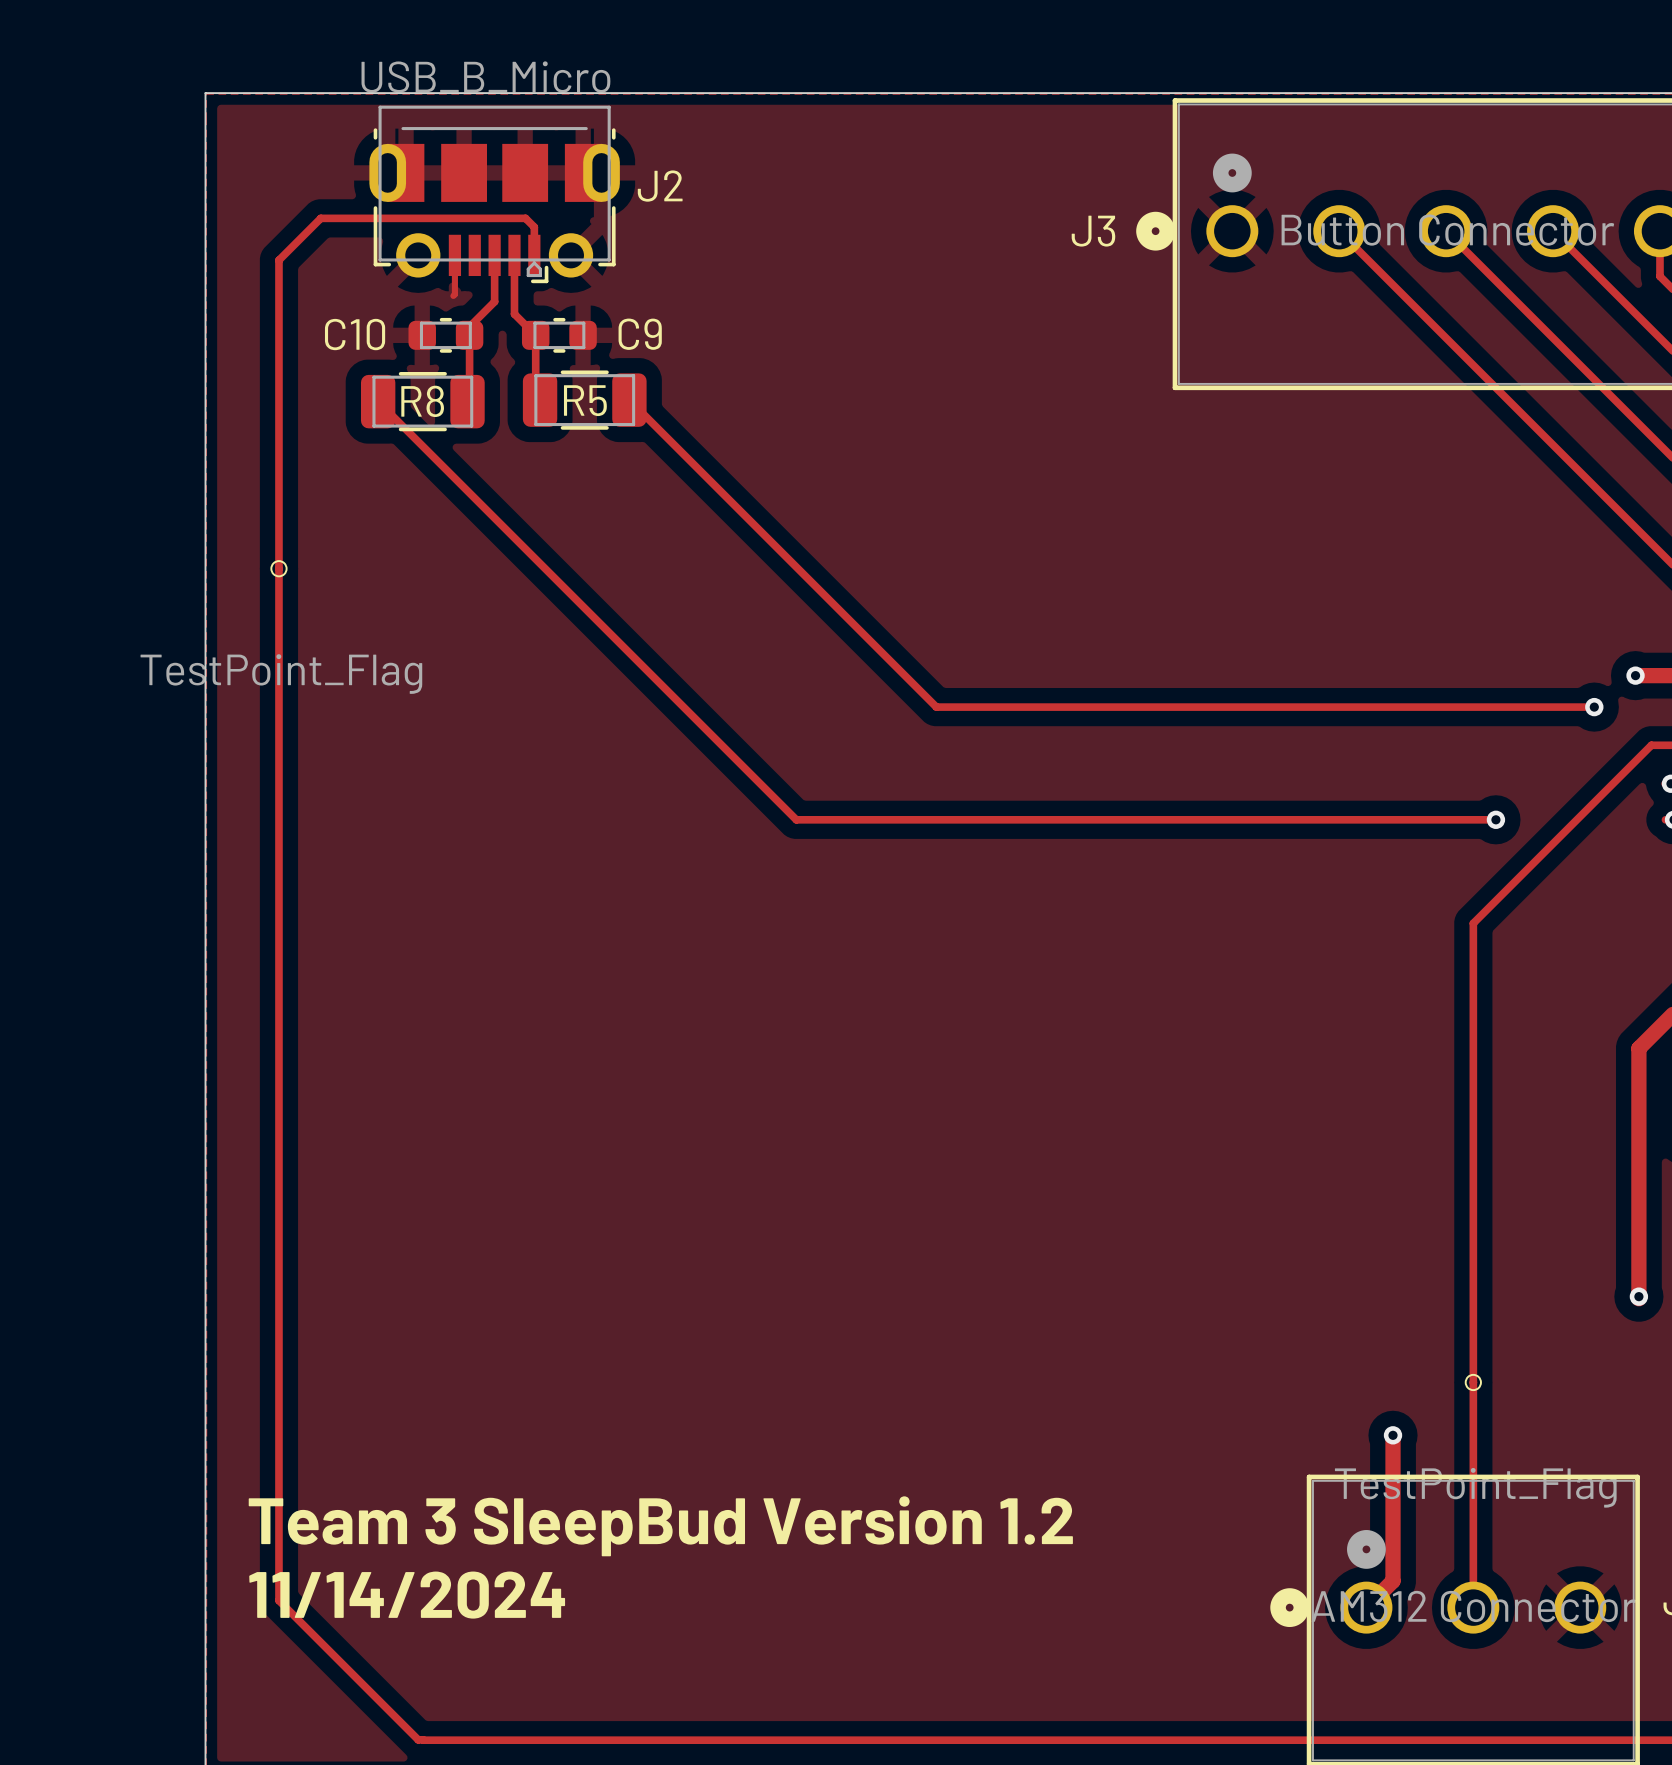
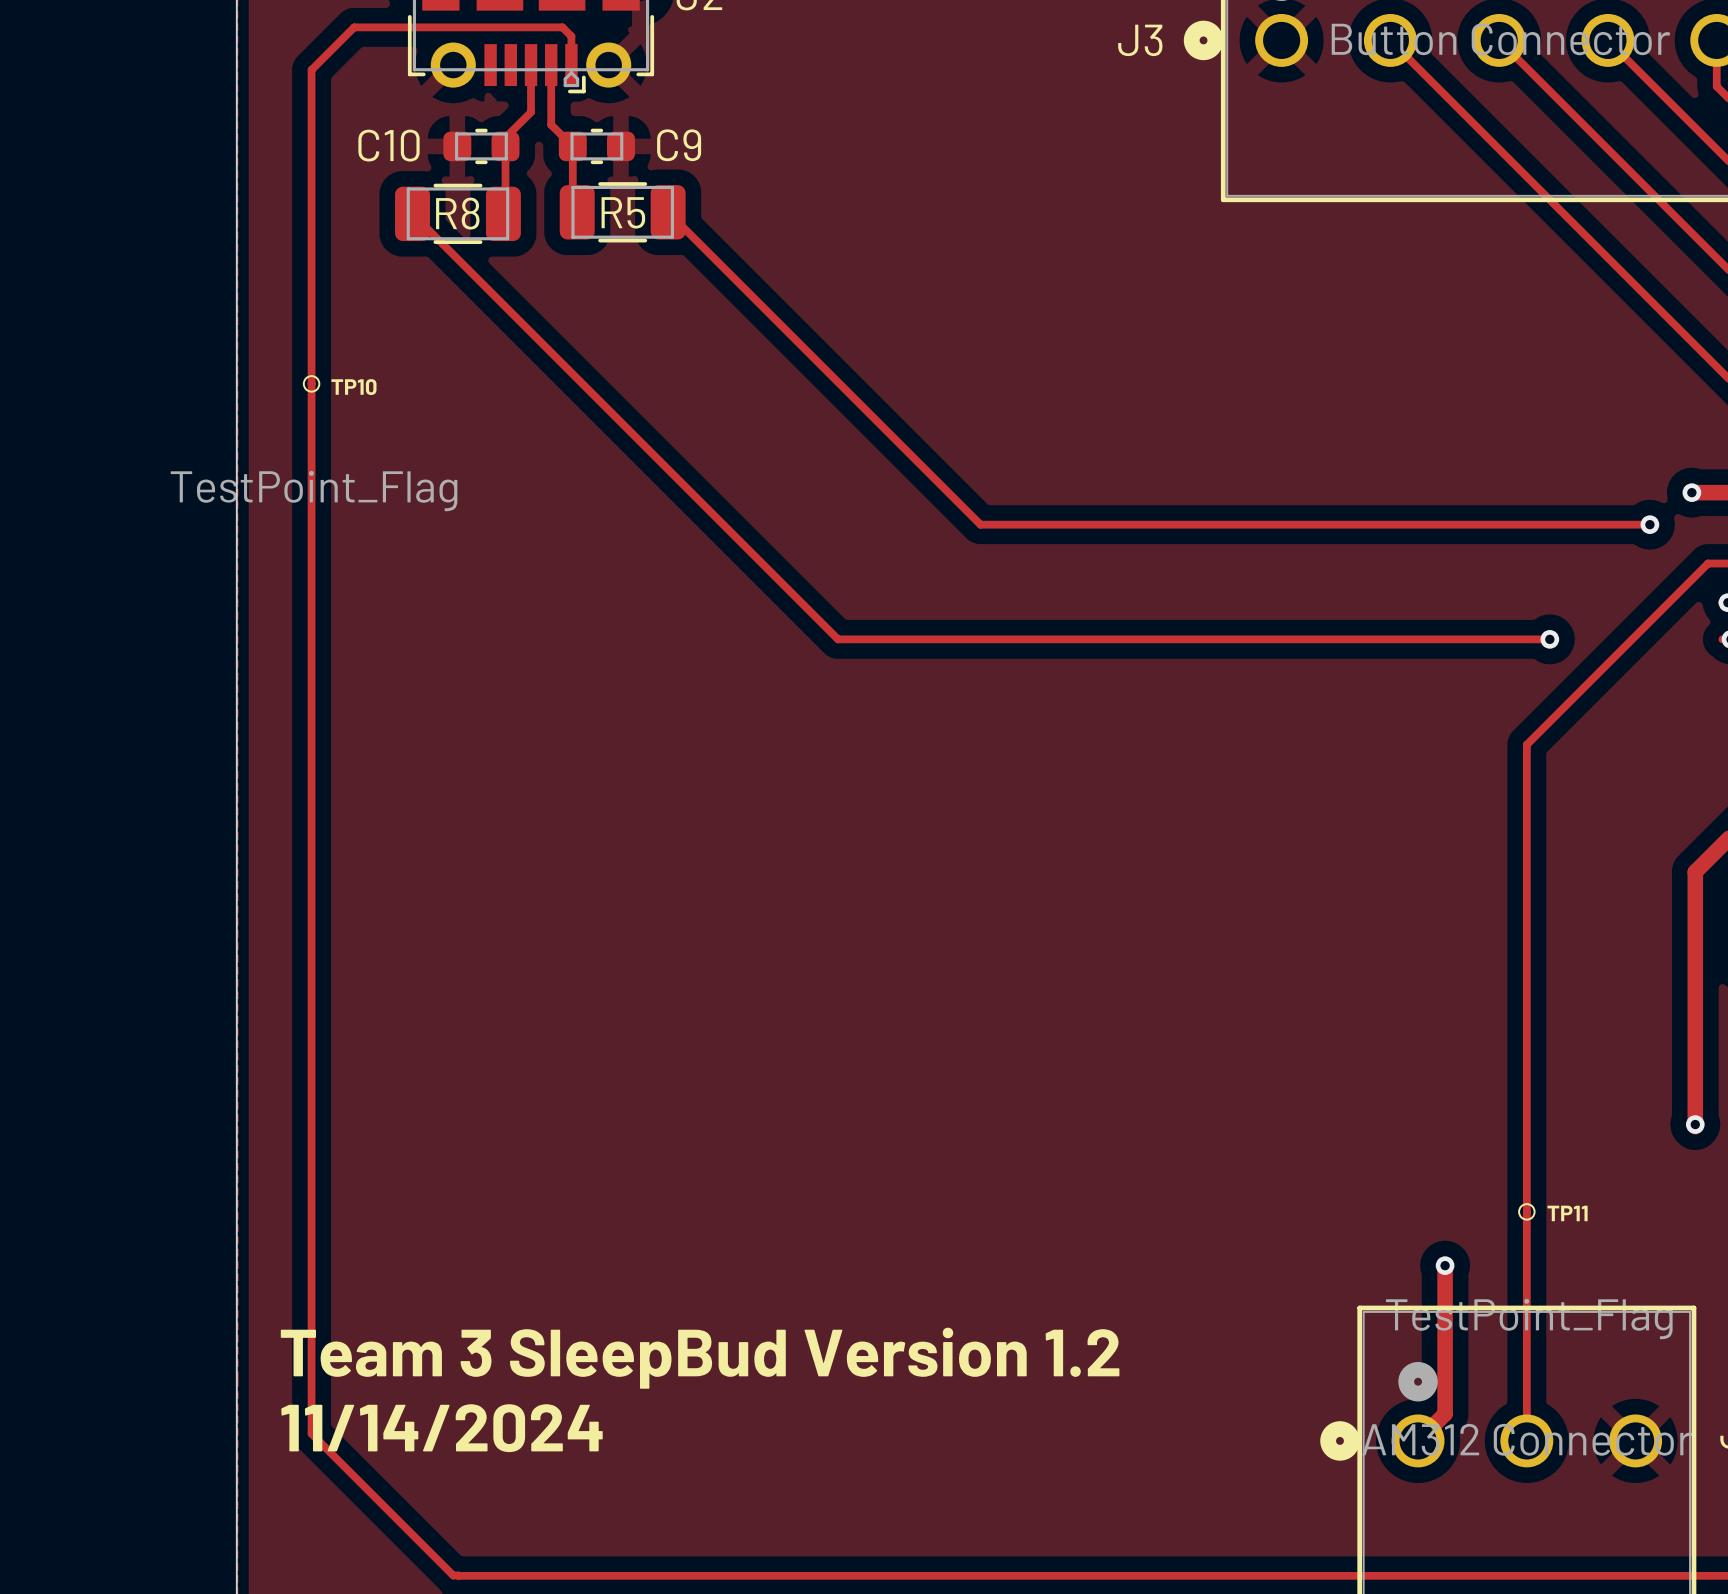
track: (454, 255) (453, 295) -> none
TP10 name: none -> TP10 (353, 387)
TP11 name: none -> TP11 (1567, 1213)

